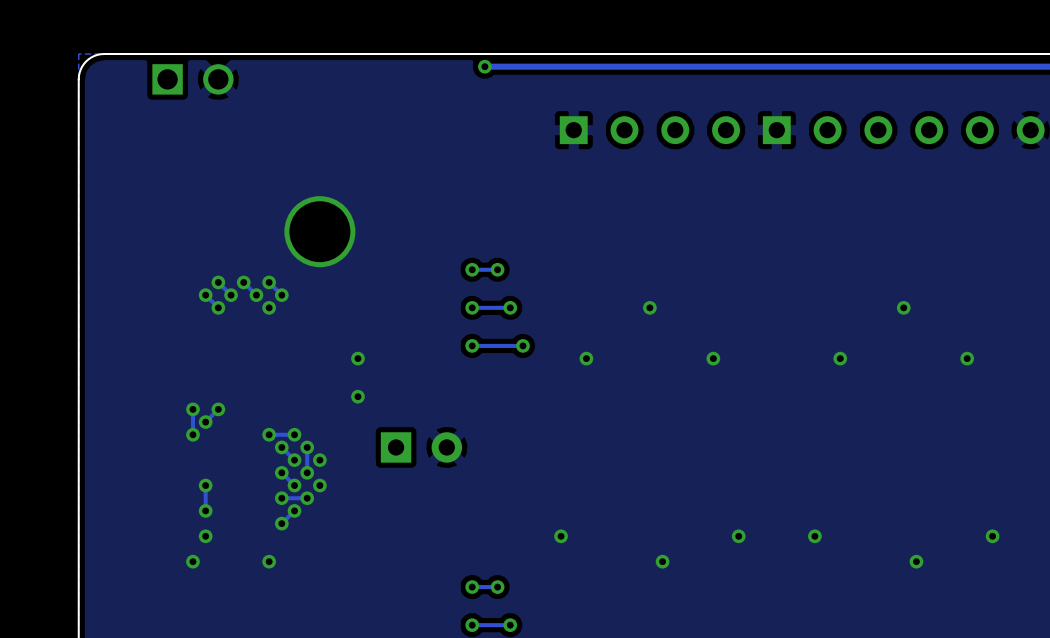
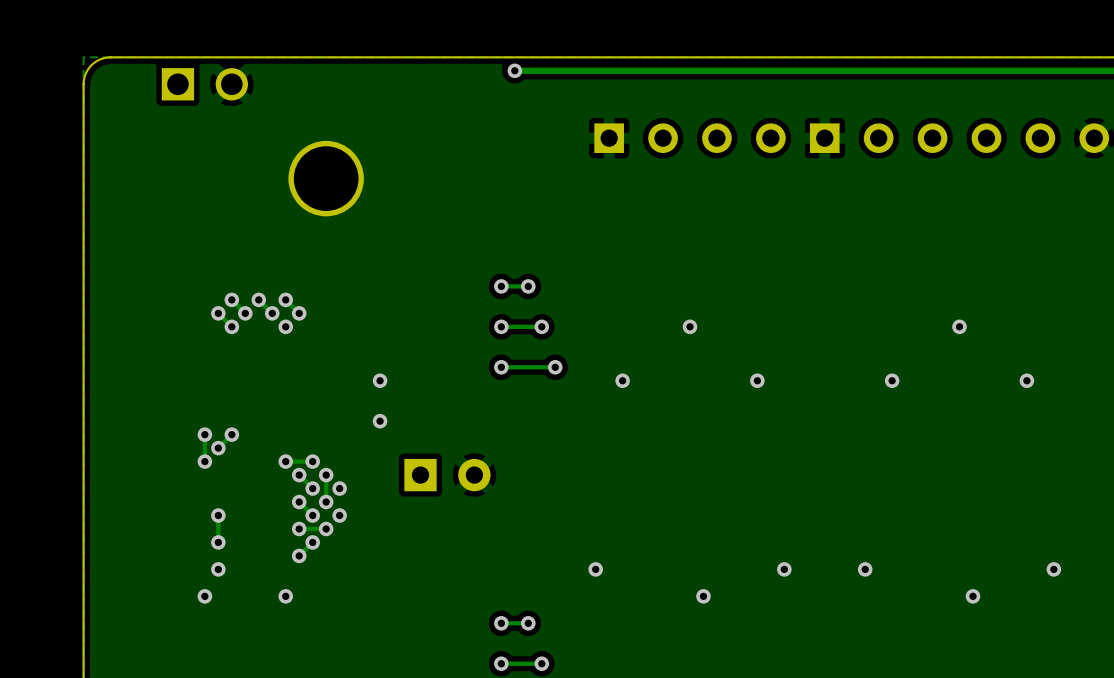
part position: (319, 231) -> (326, 178)

